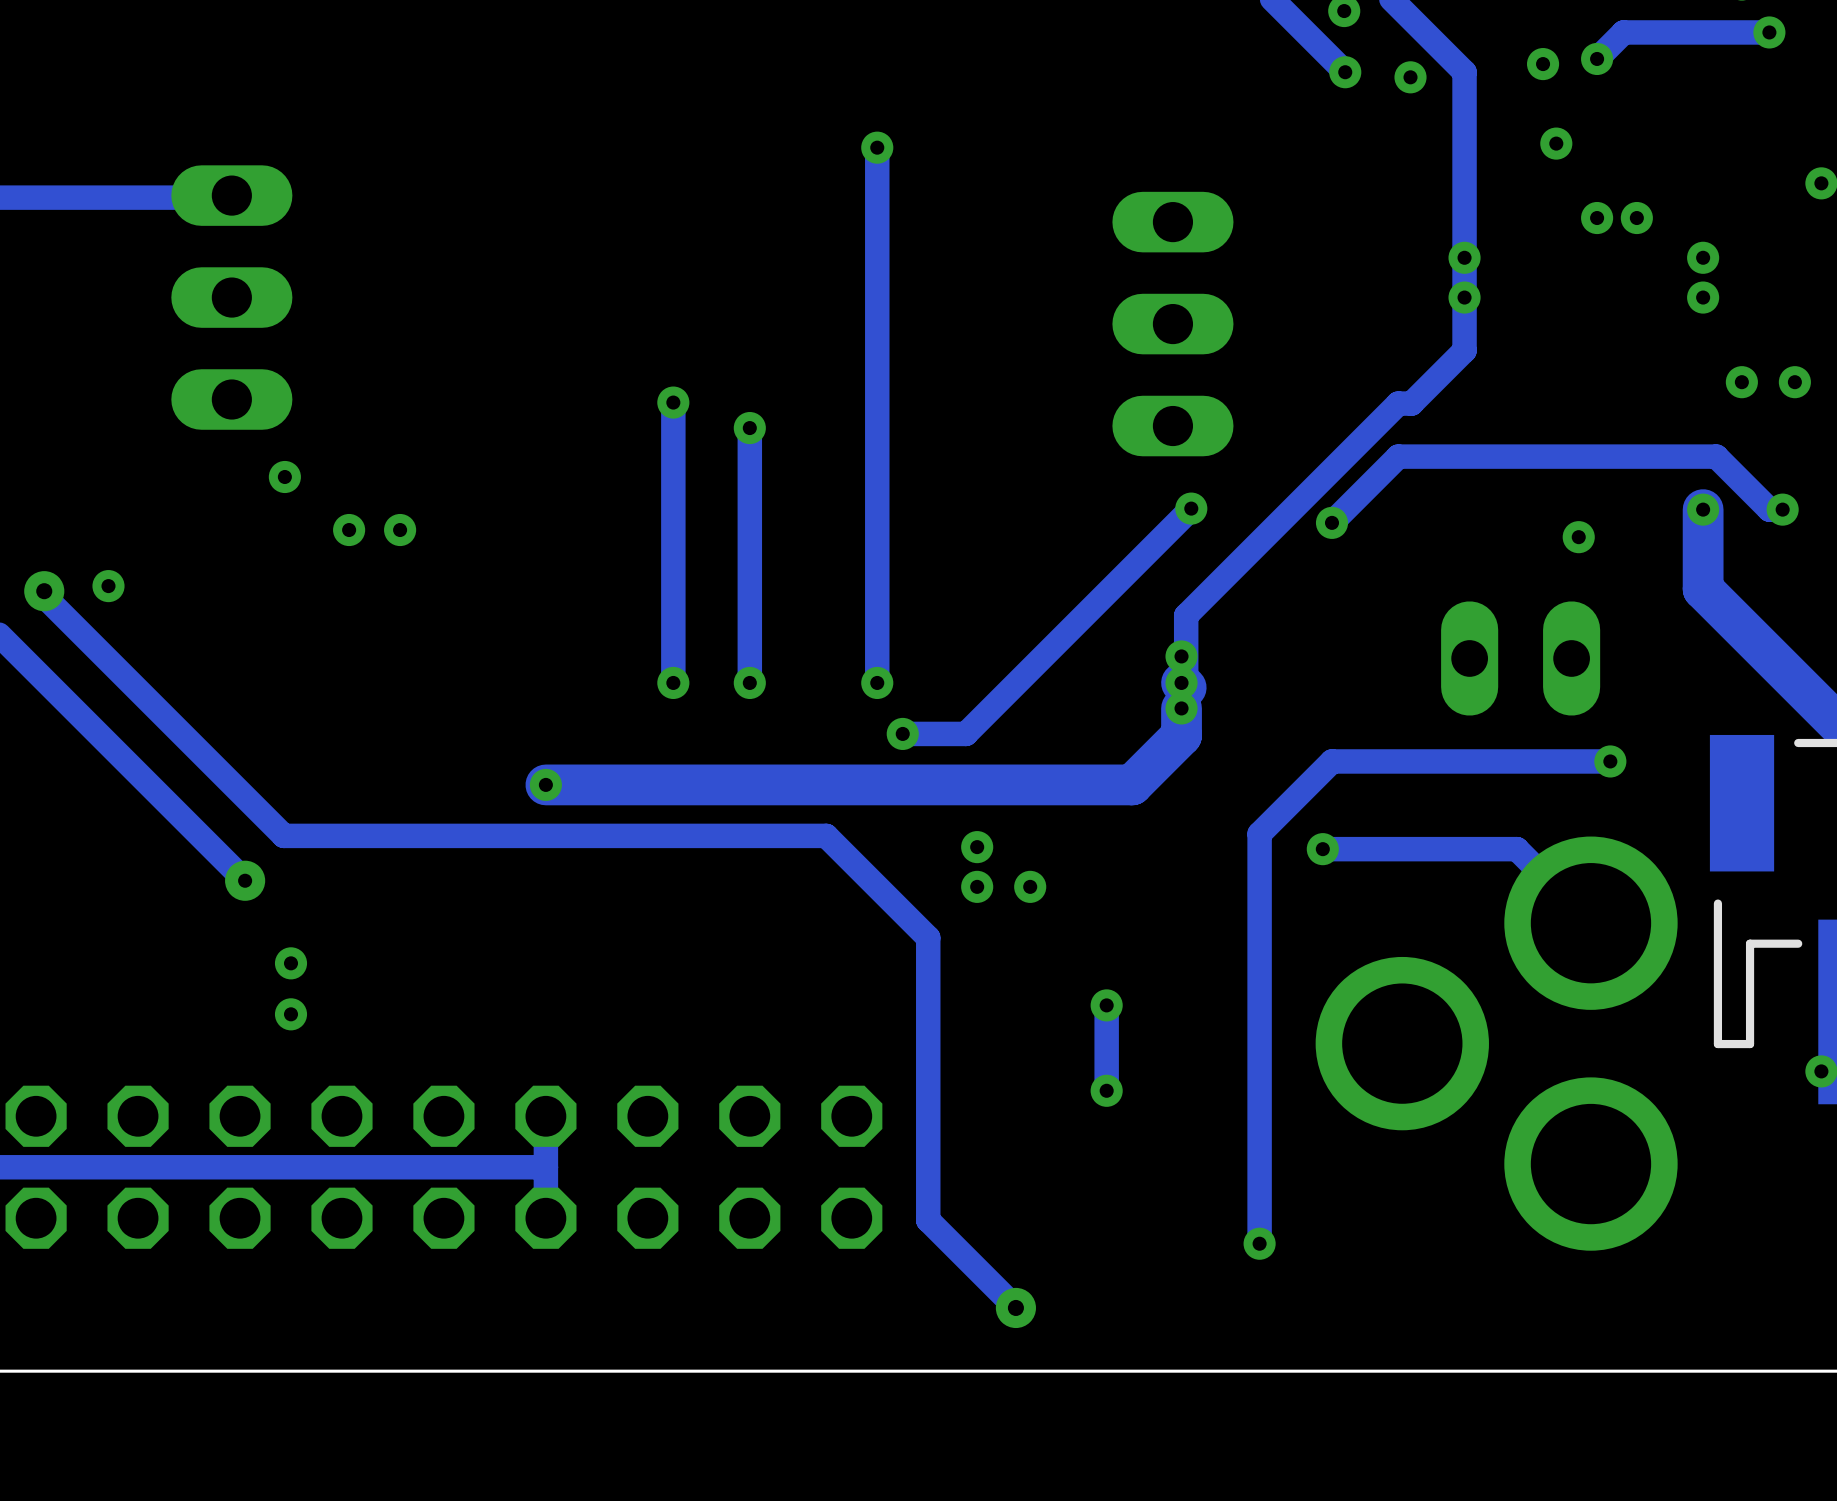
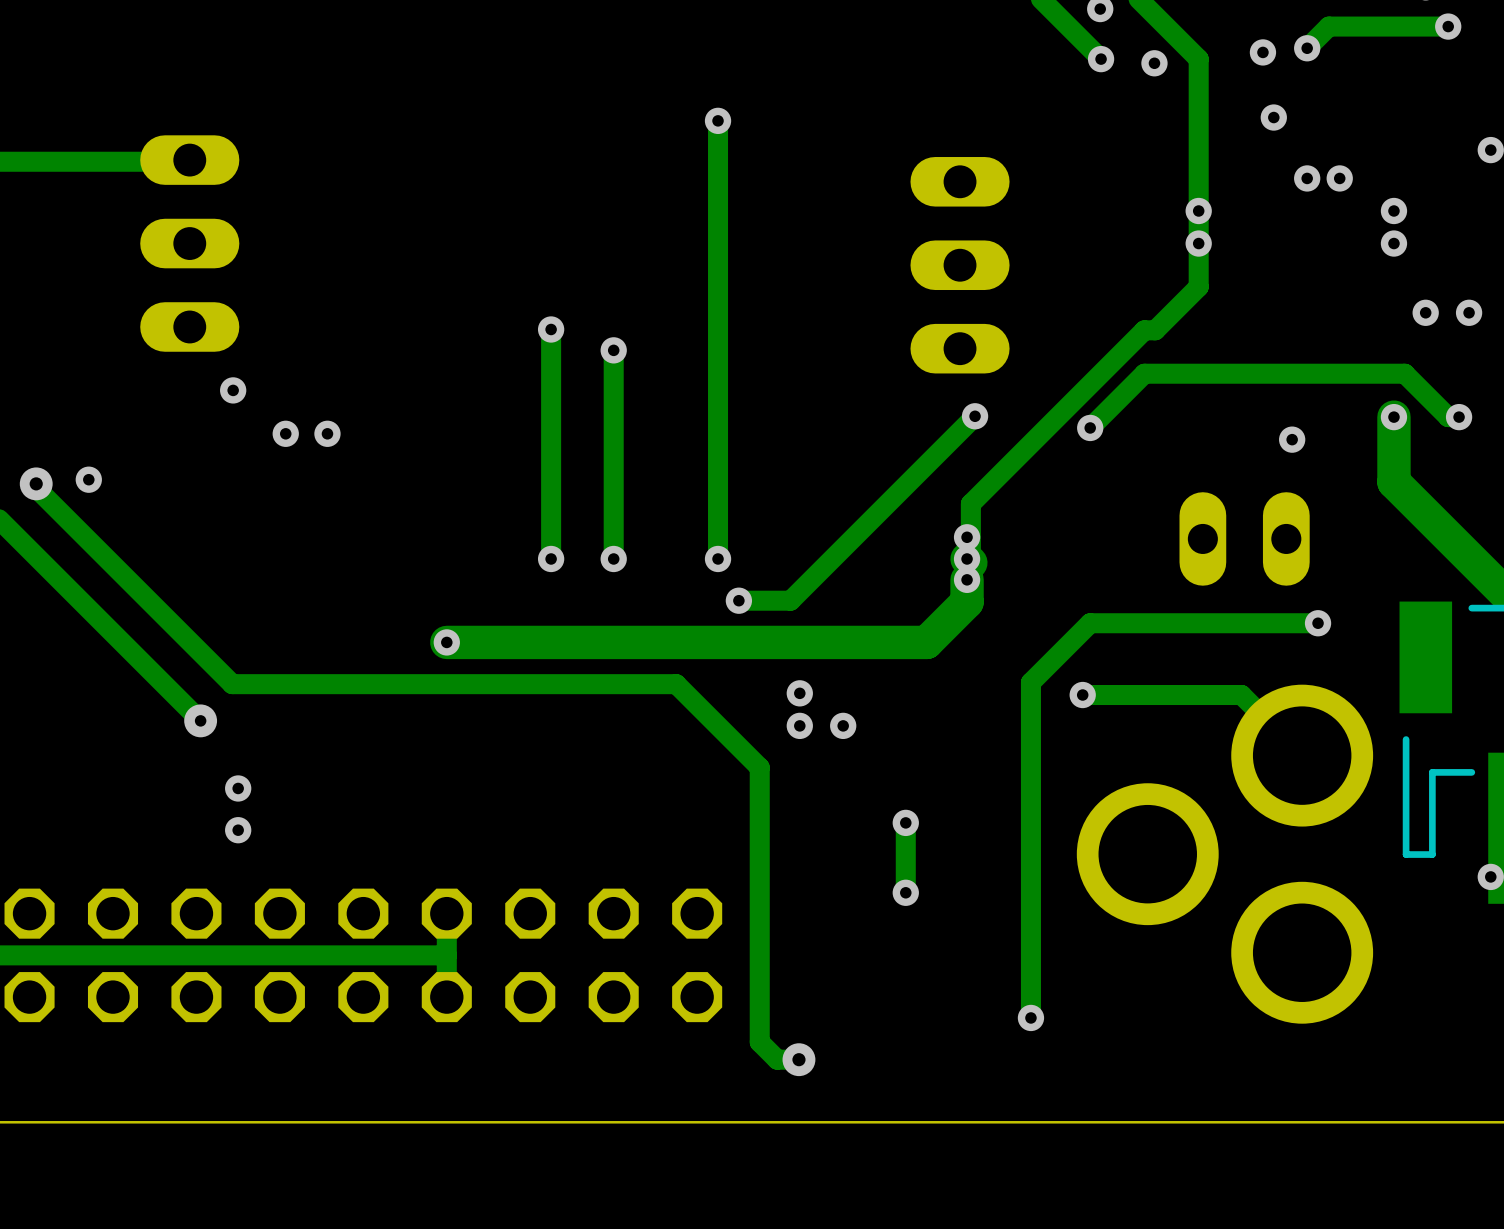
track: (928, 1220) (1015, 1307) -> (759, 998) (759, 1042) (777, 1059) (798, 1059)
via position: (1015, 1307) -> (798, 1059)

